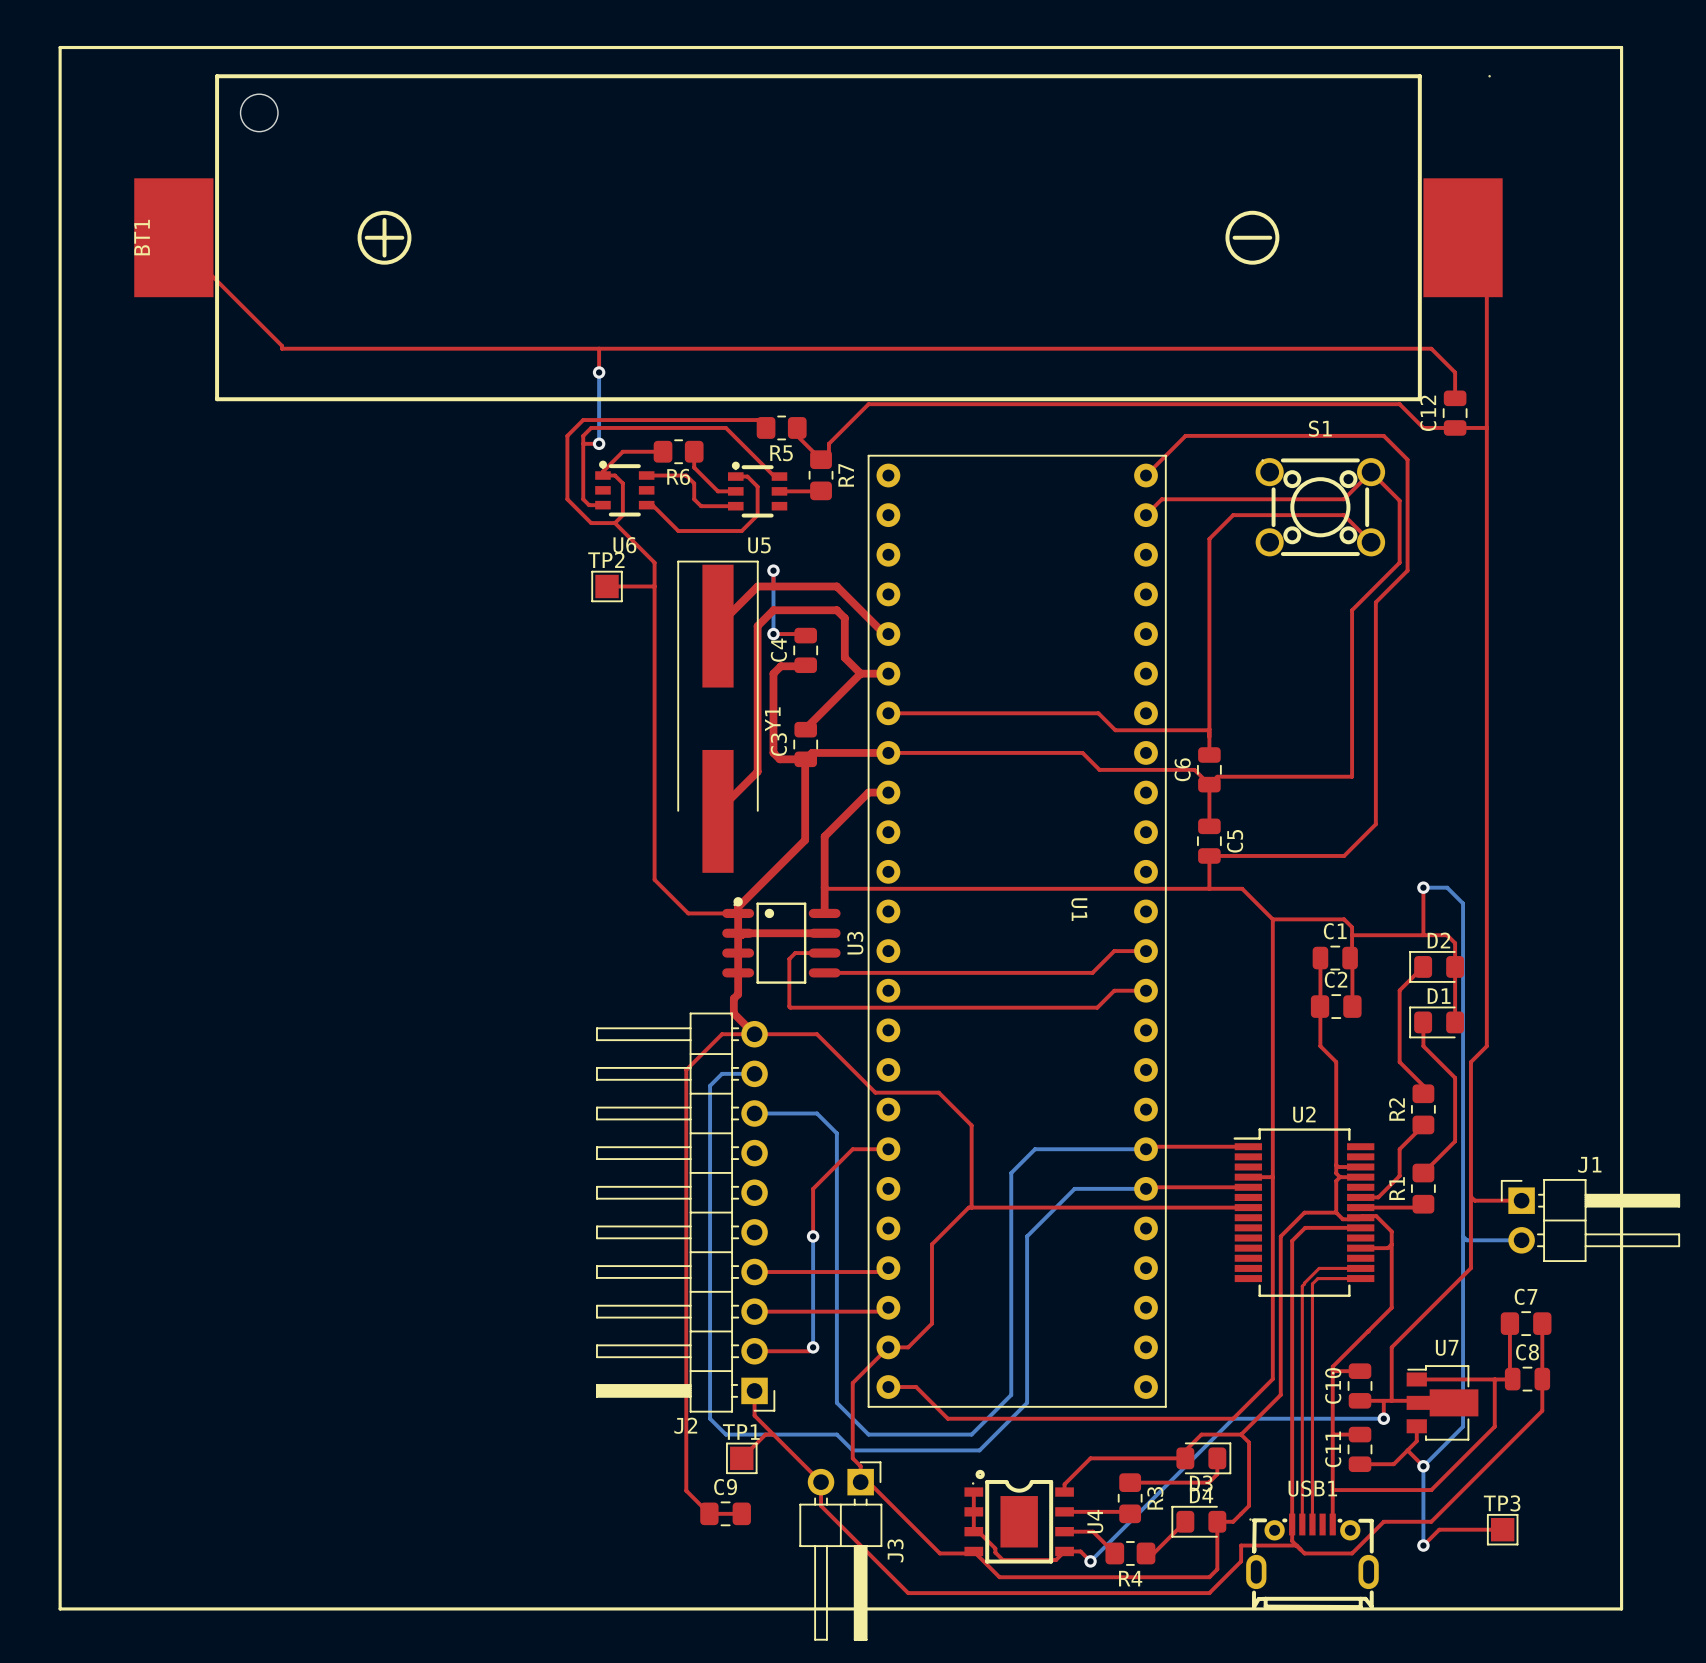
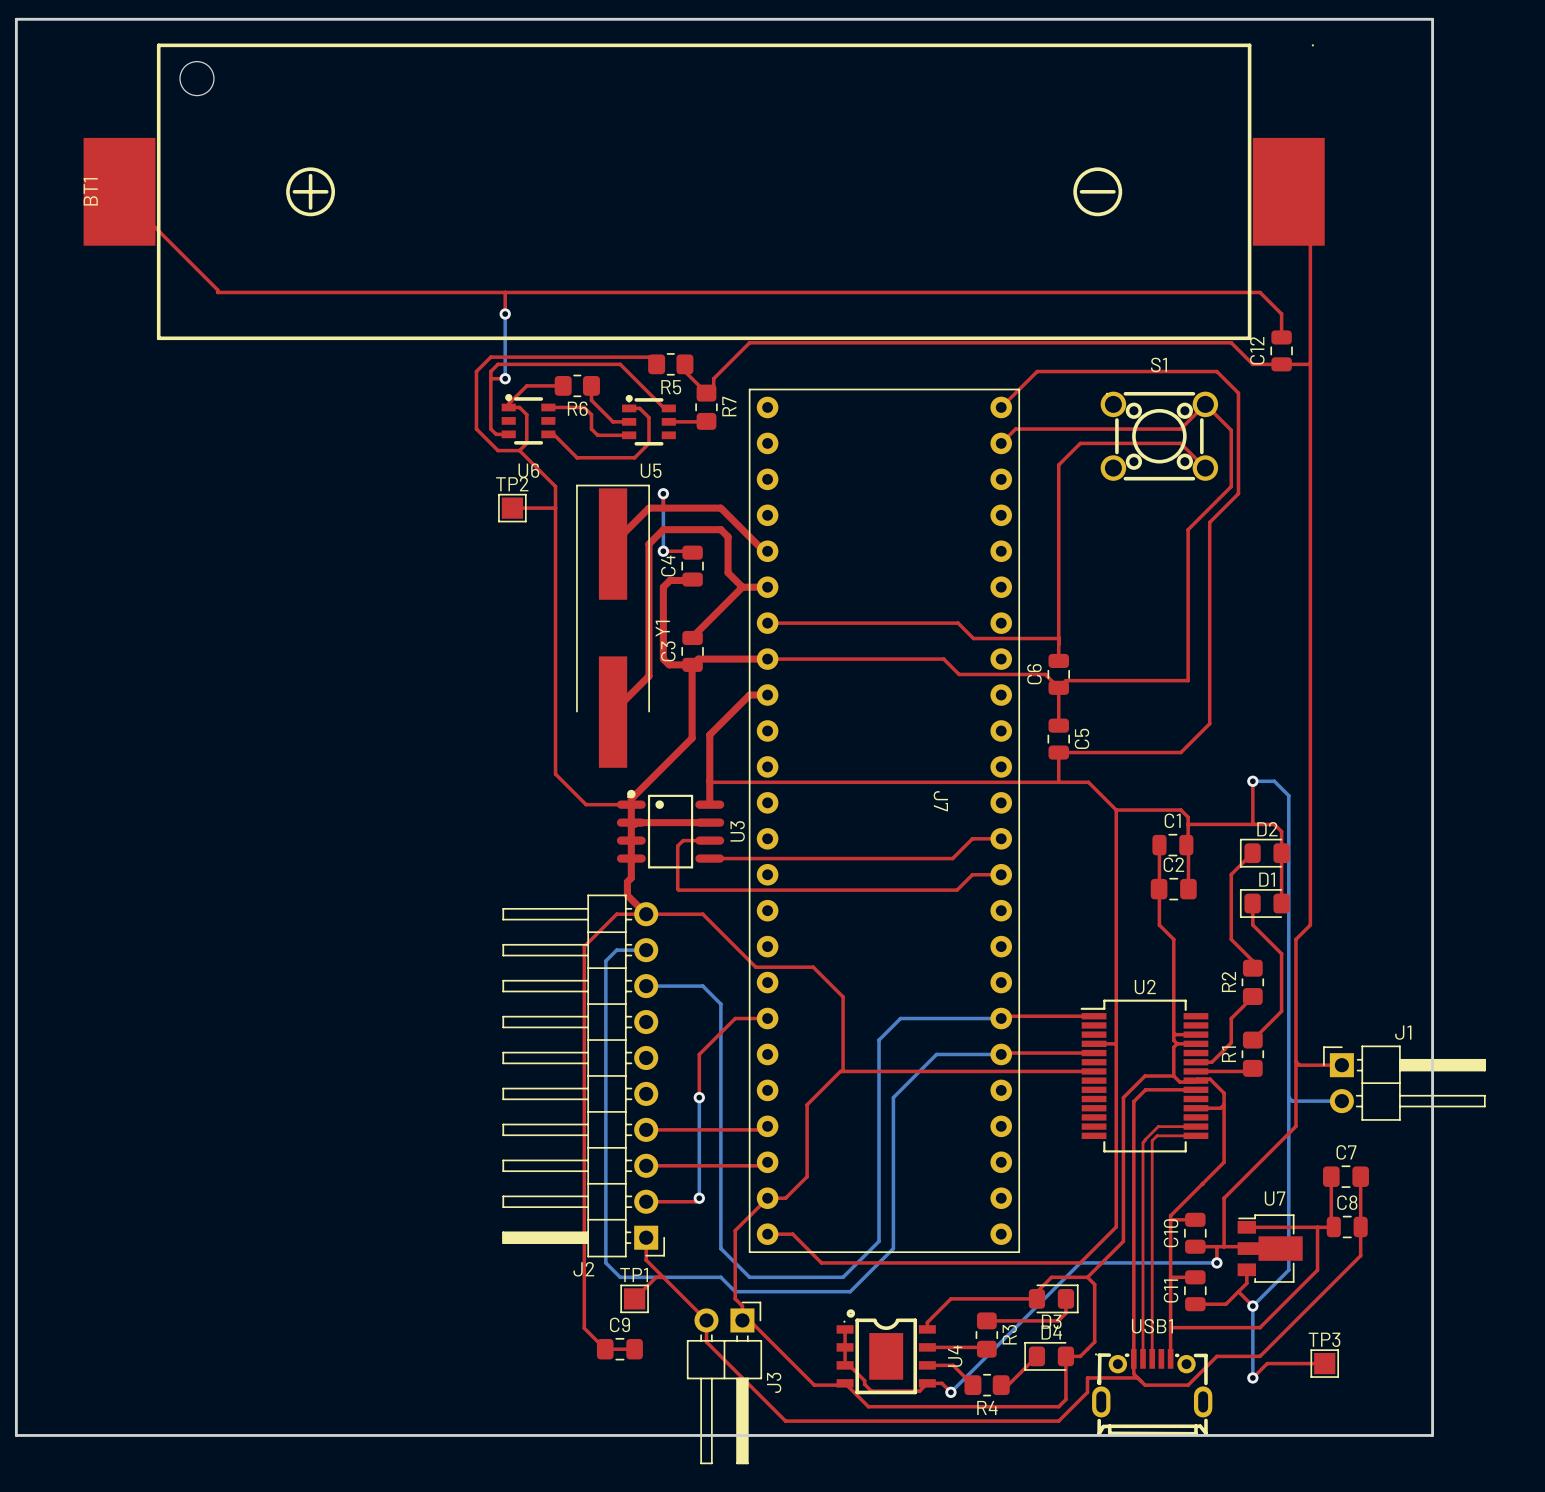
line: (60, 47) (1621, 47) (1621, 1608) (60, 1608) (60, 47) -> none
board edge: none -> (16, 19) (1432, 19) (1432, 1435) (16, 1435) (16, 19)
U1 name: U1 (1079, 909) -> J7 (940, 801)

